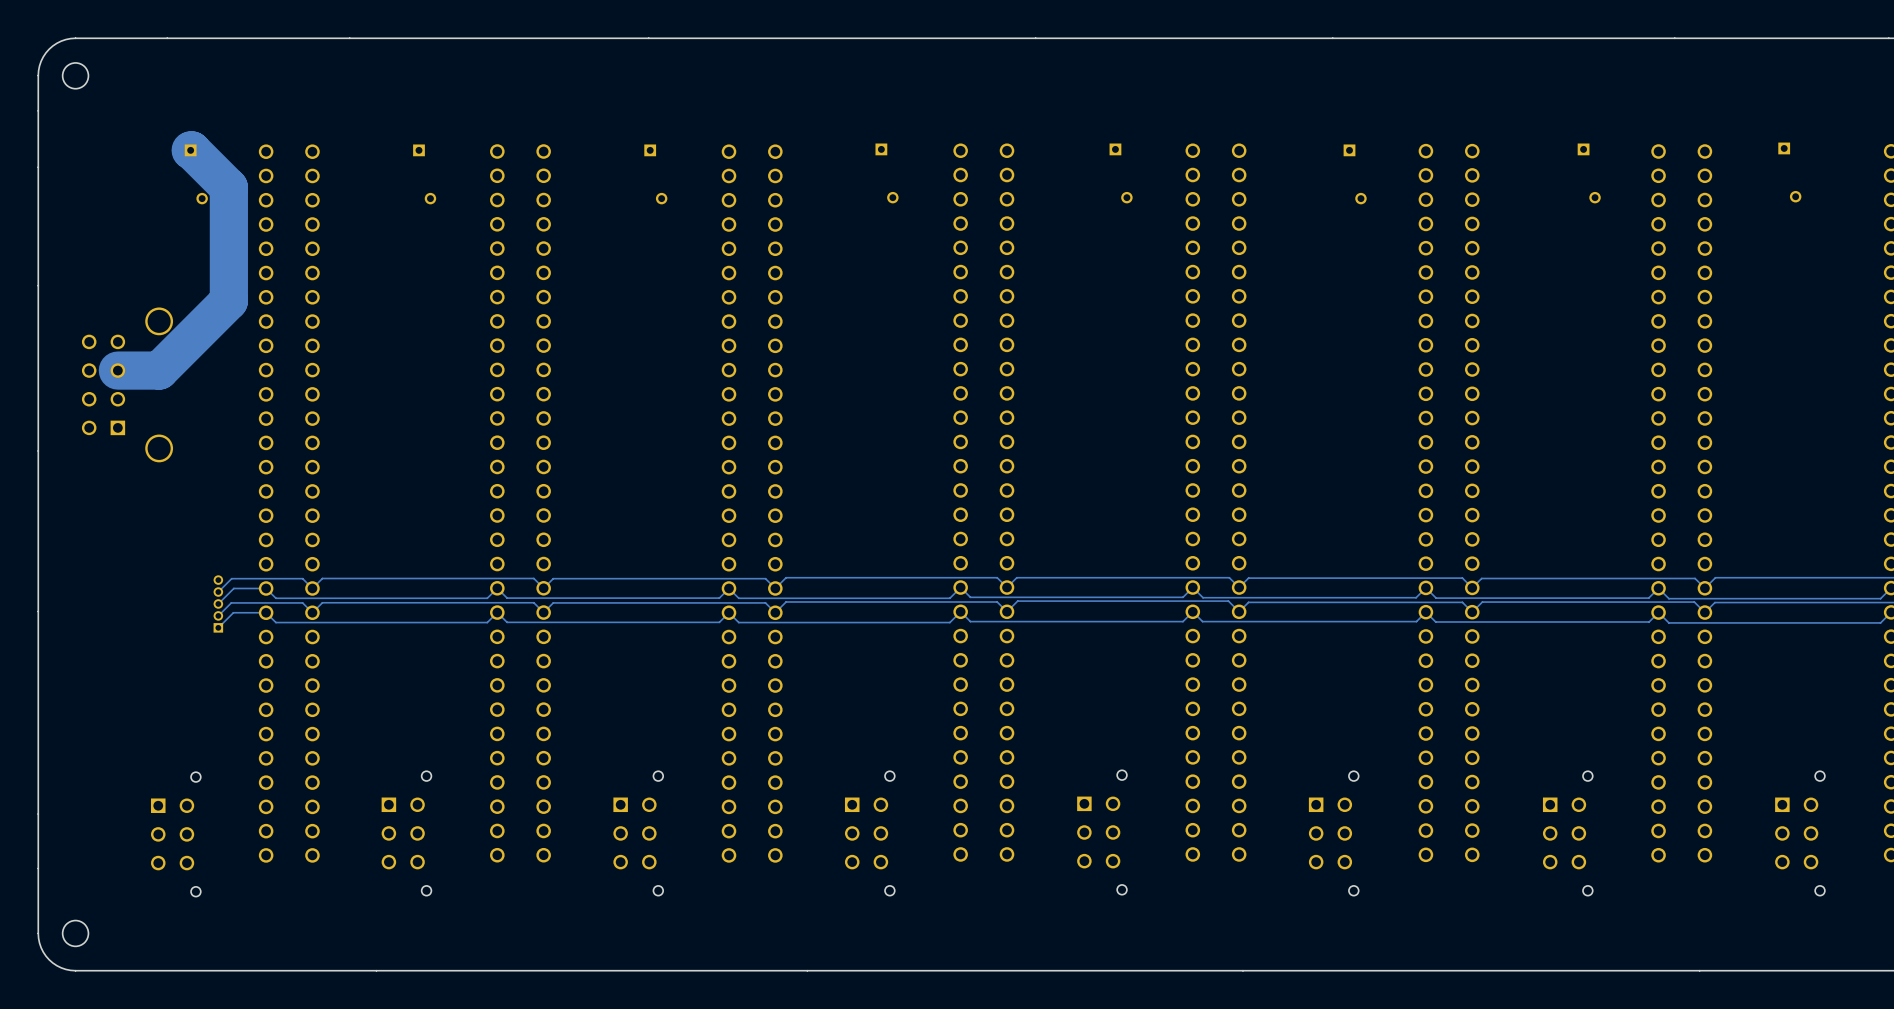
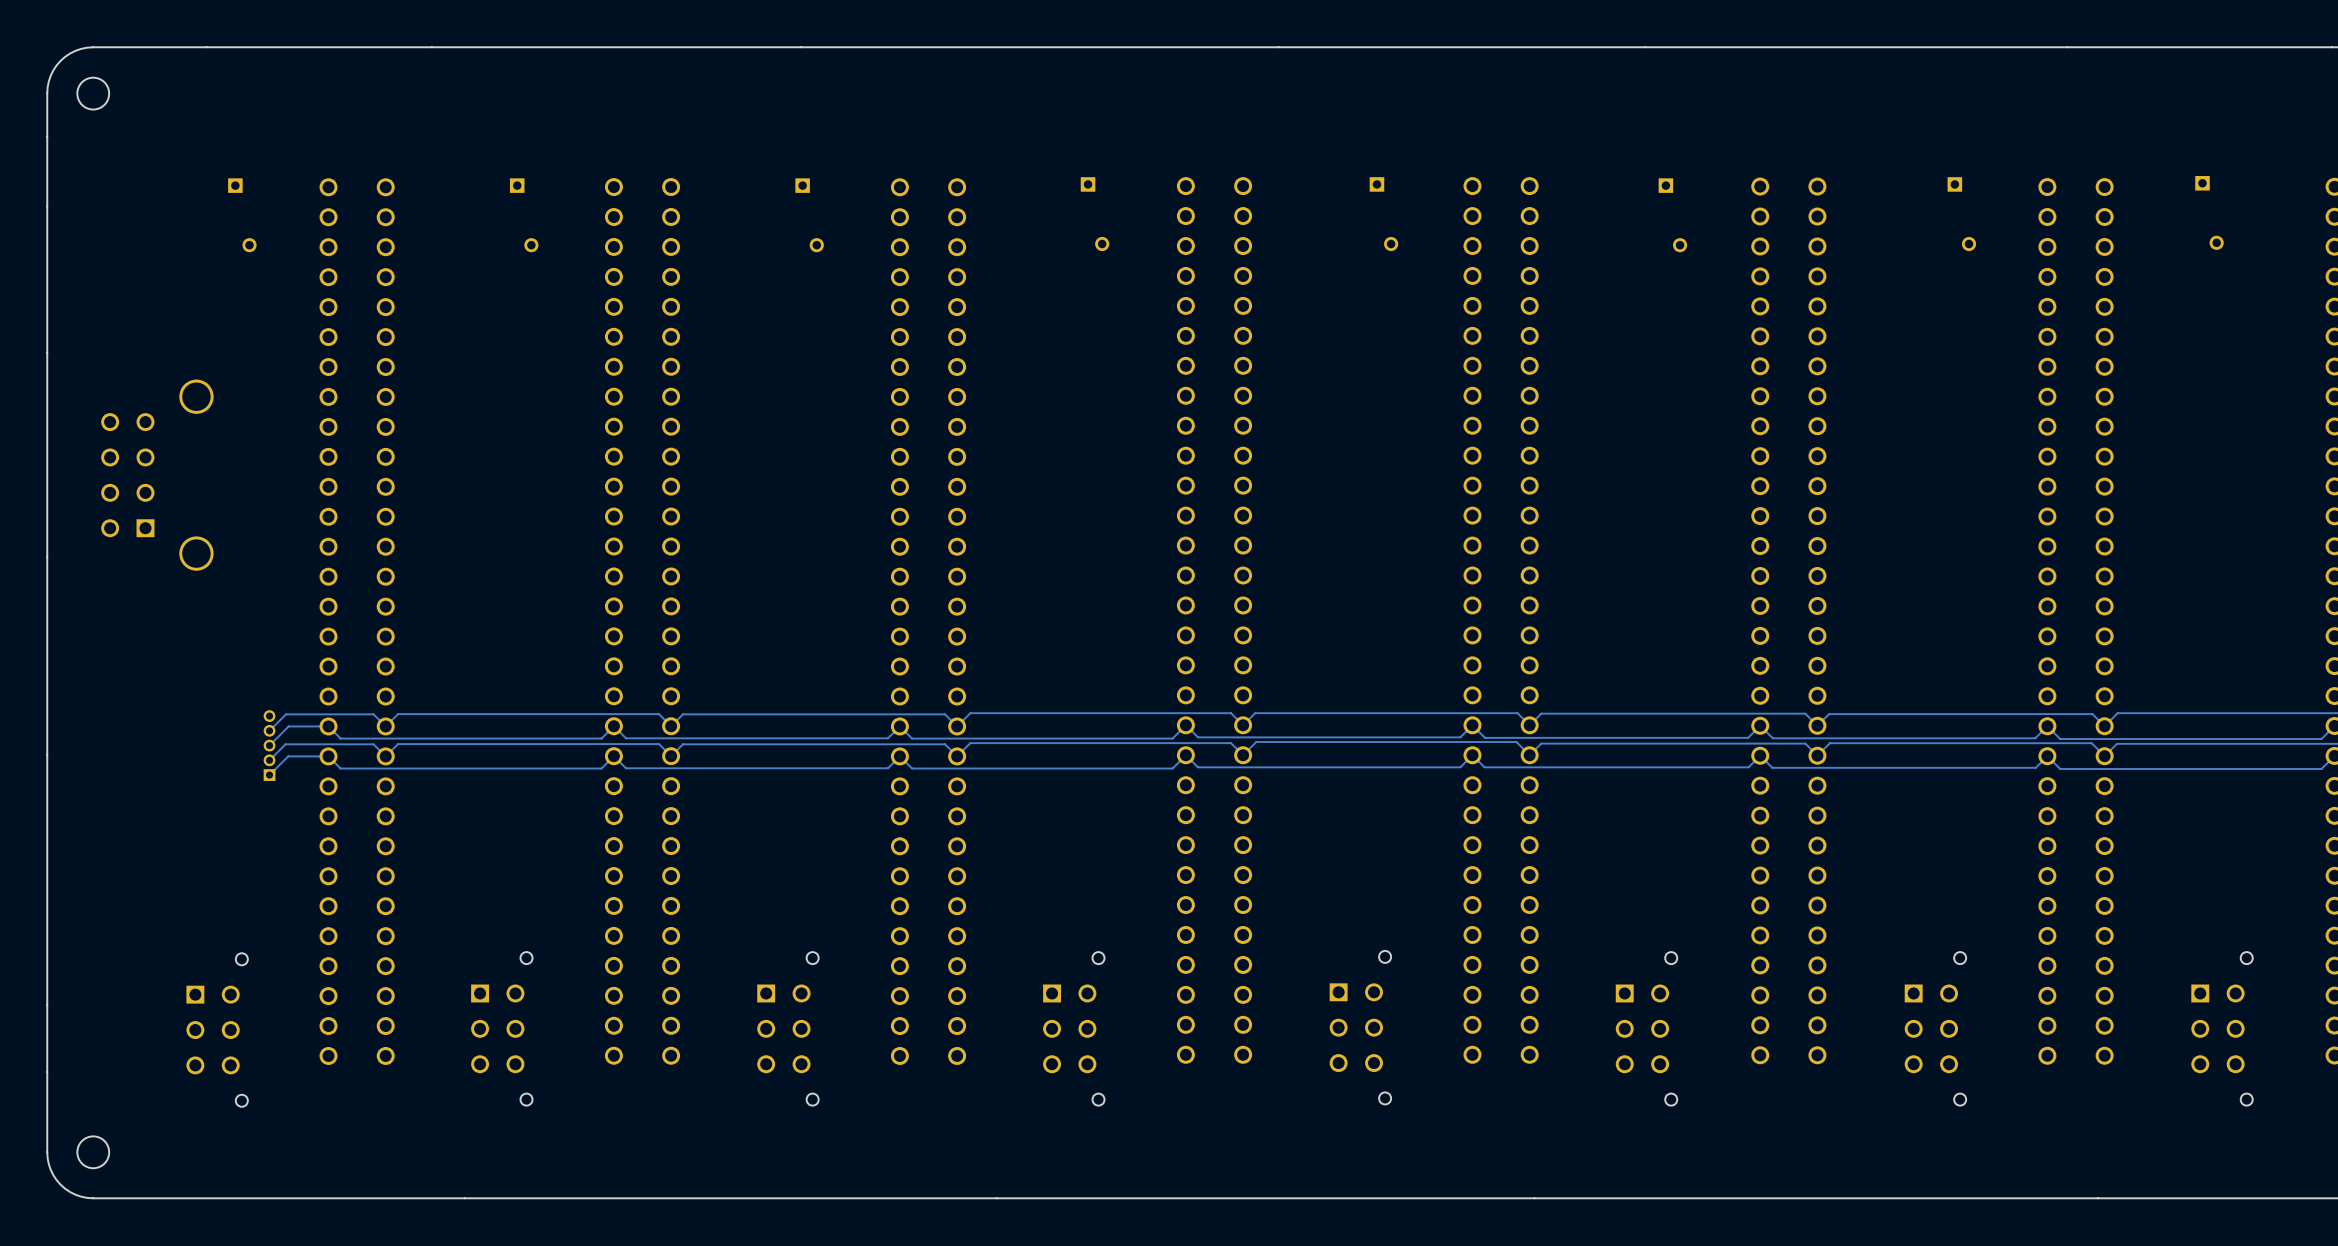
track: (190, 150) (228, 187) (228, 301) (159, 370) (117, 370) -> none

